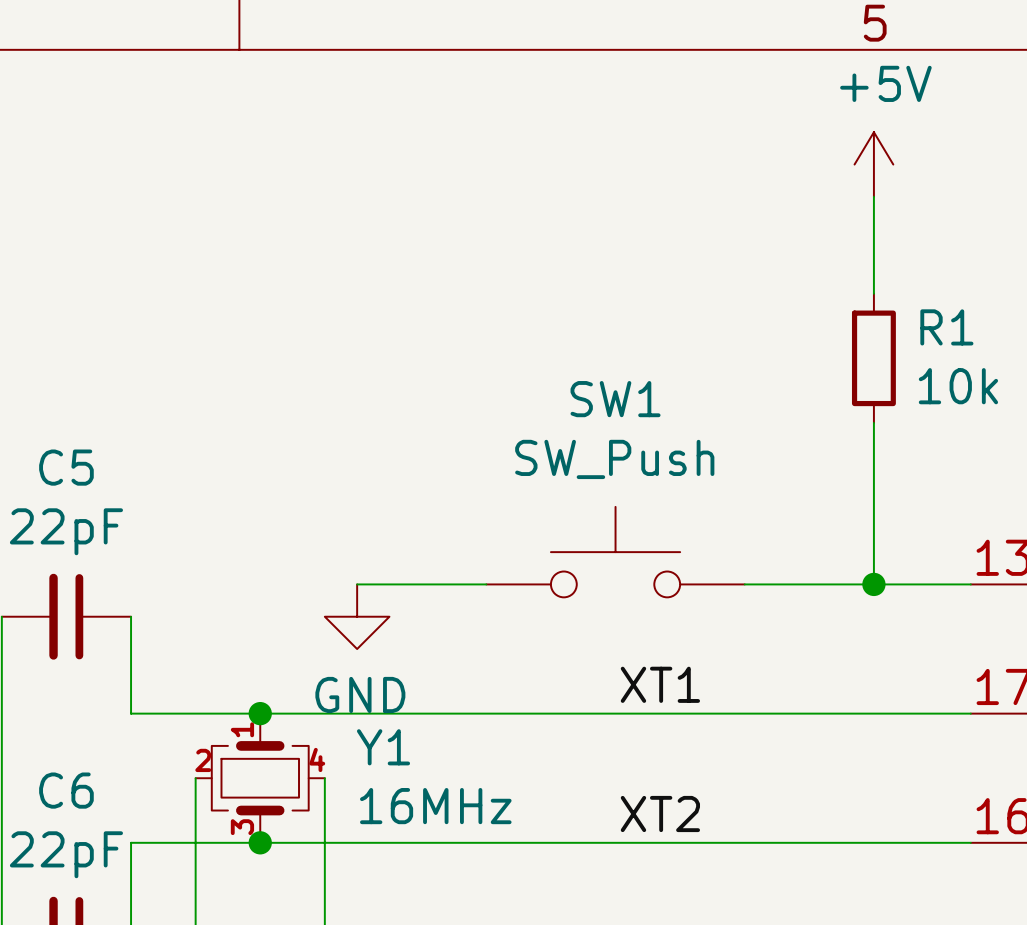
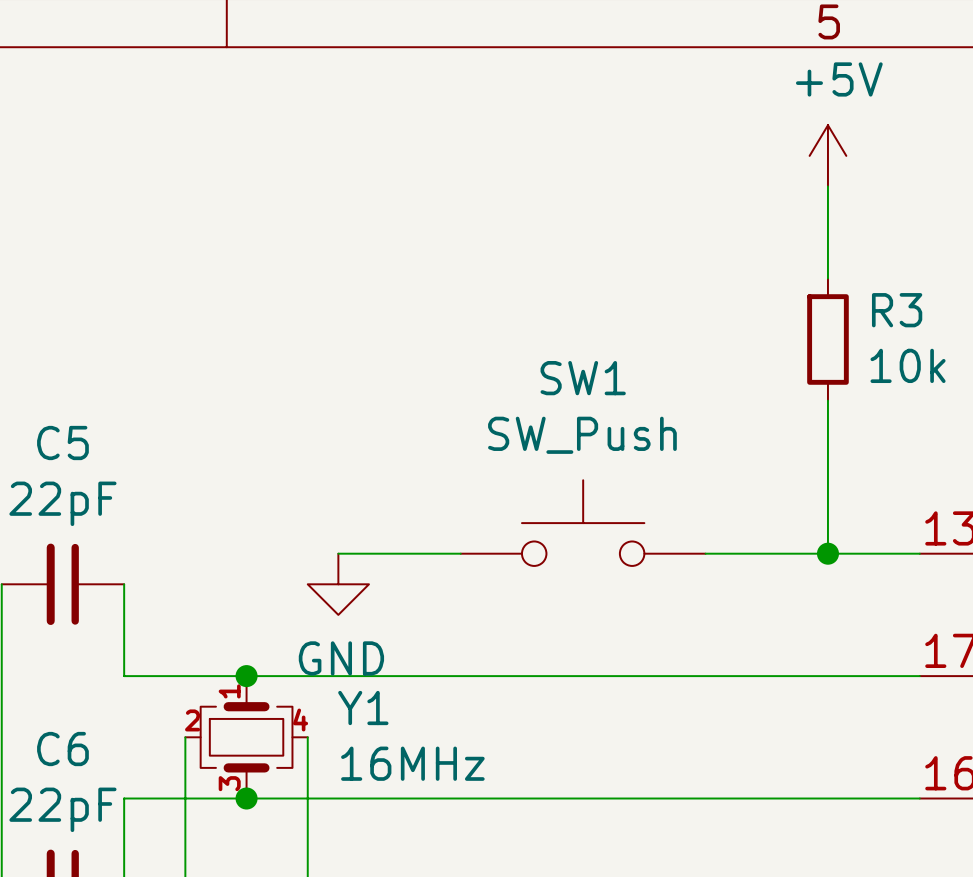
R1 name: R1 (946, 327) -> R3 (897, 310)
label: XT1 (660, 684) -> none
label: XT2 (660, 813) -> none

